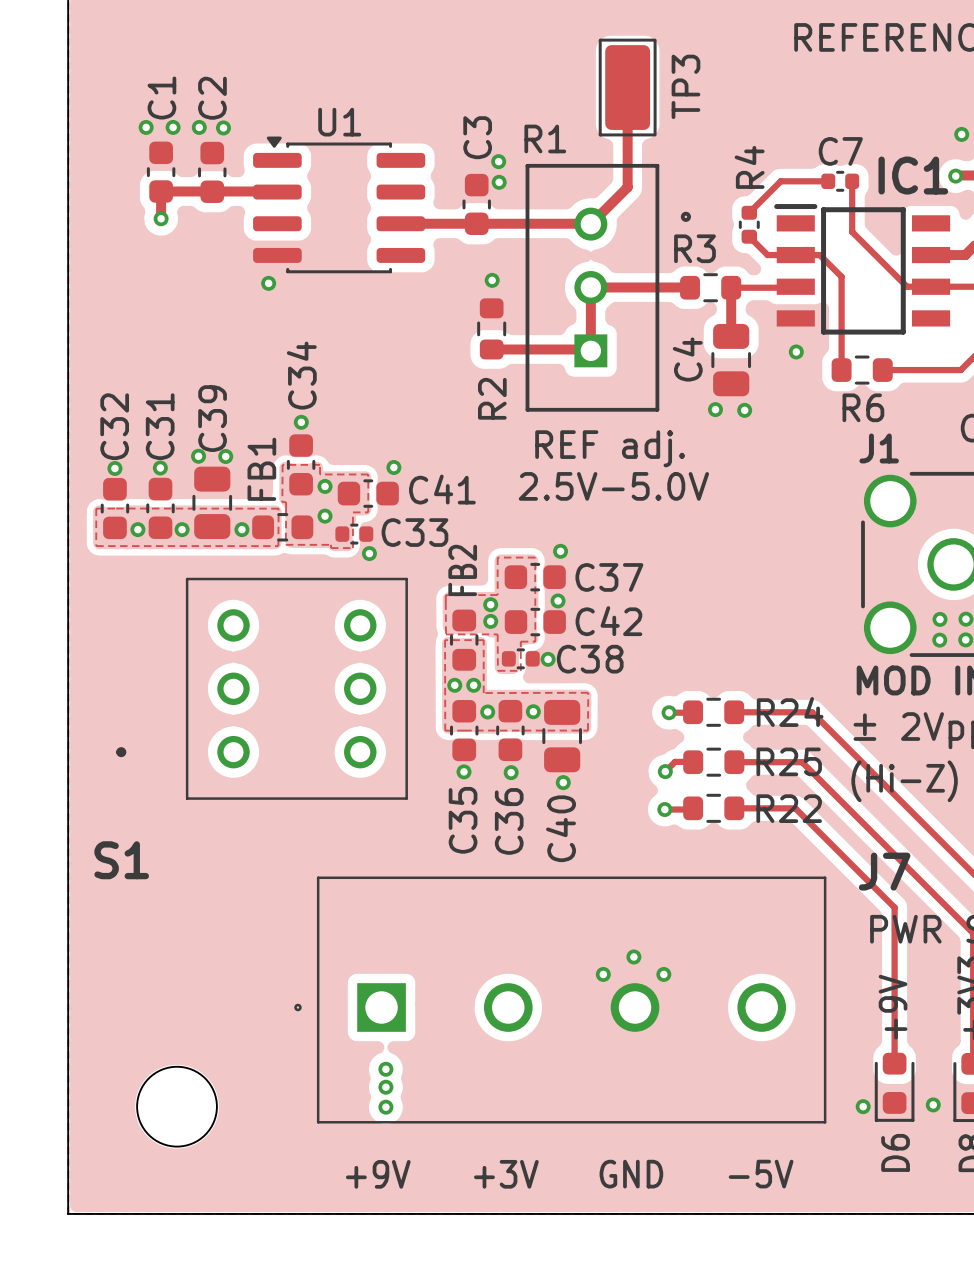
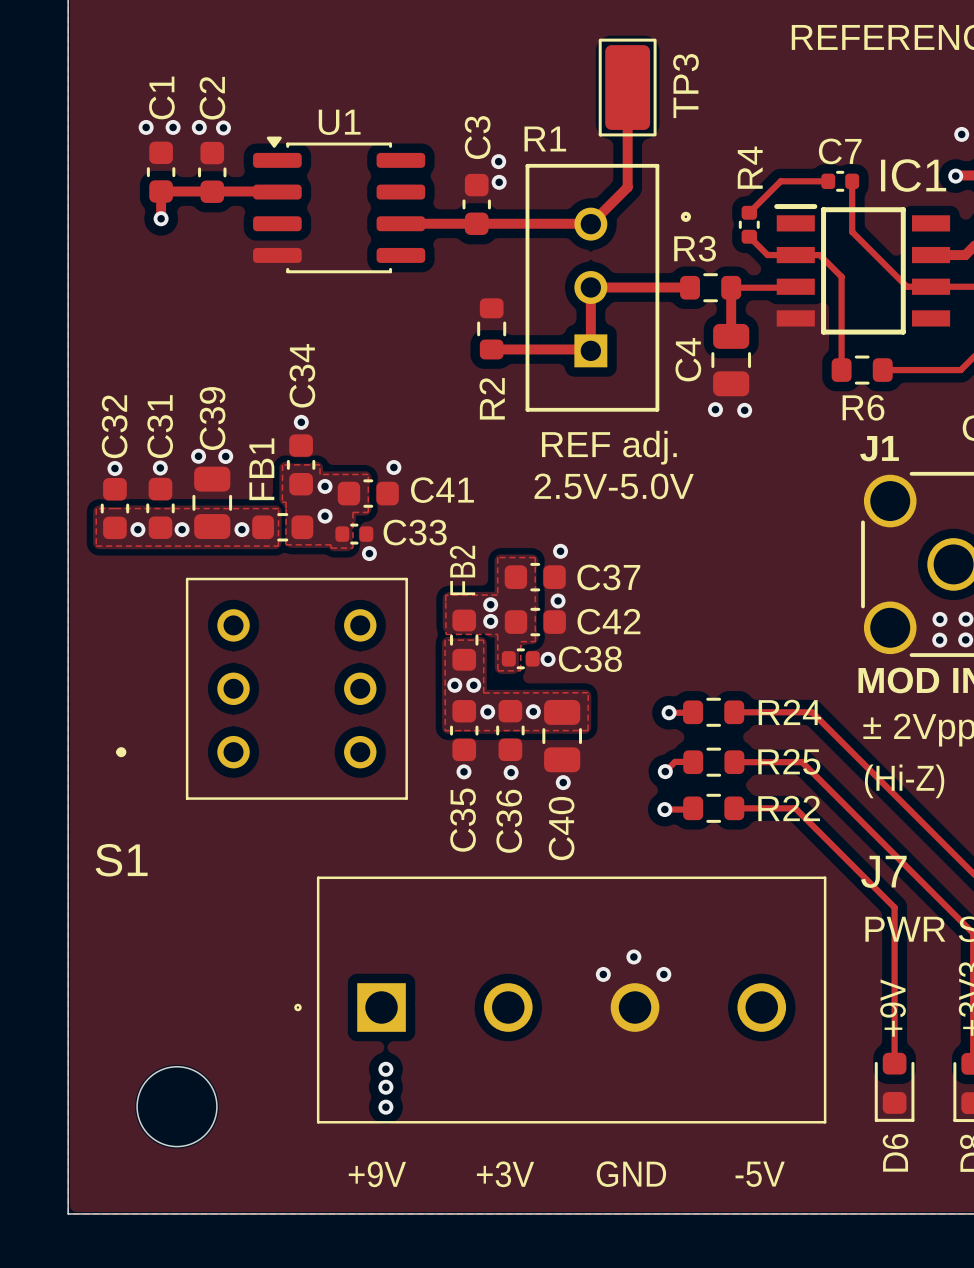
via: (492, 280) -> none
via: (268, 283) -> none
via: (796, 351) -> none
via: (933, 1104) -> none
via: (863, 1106) -> none

